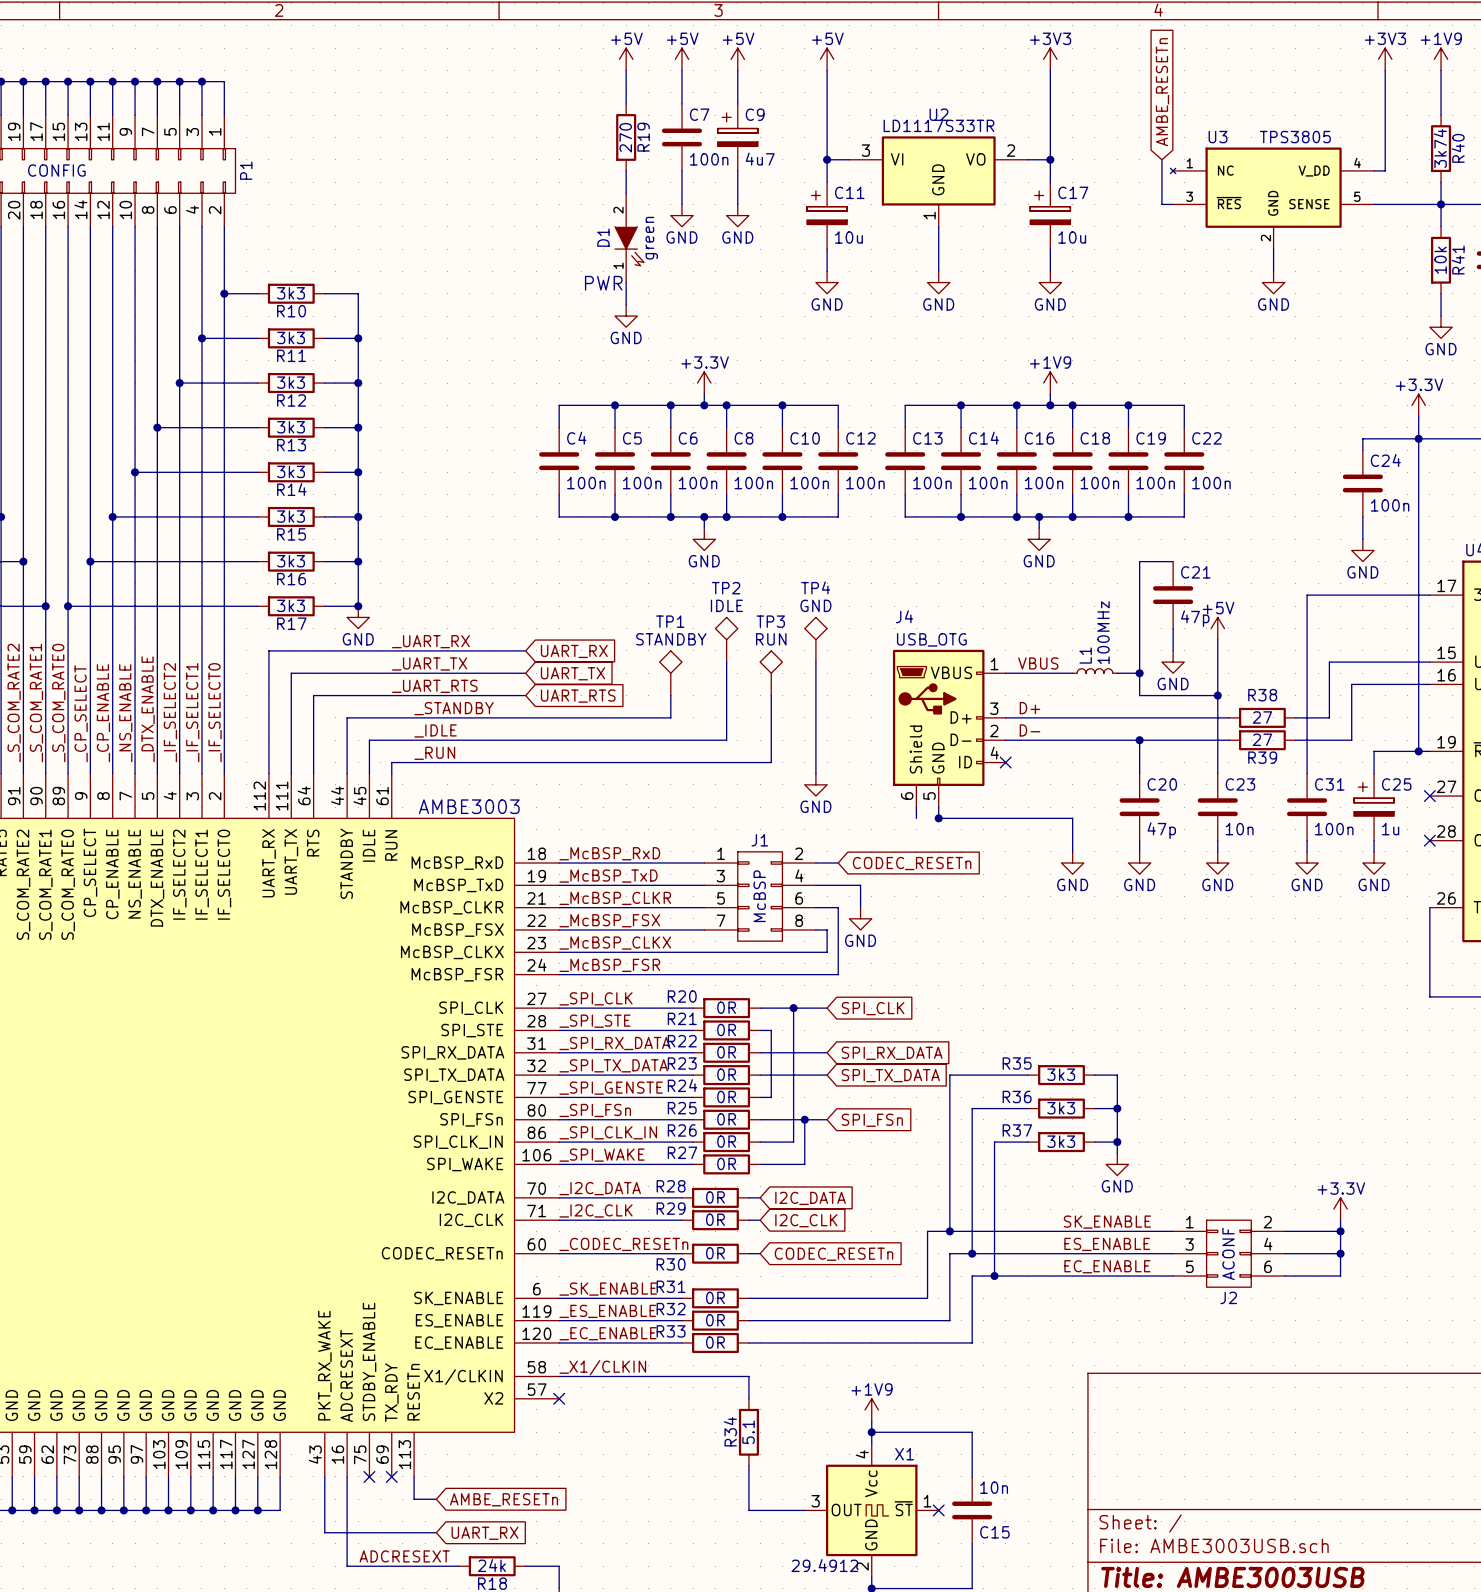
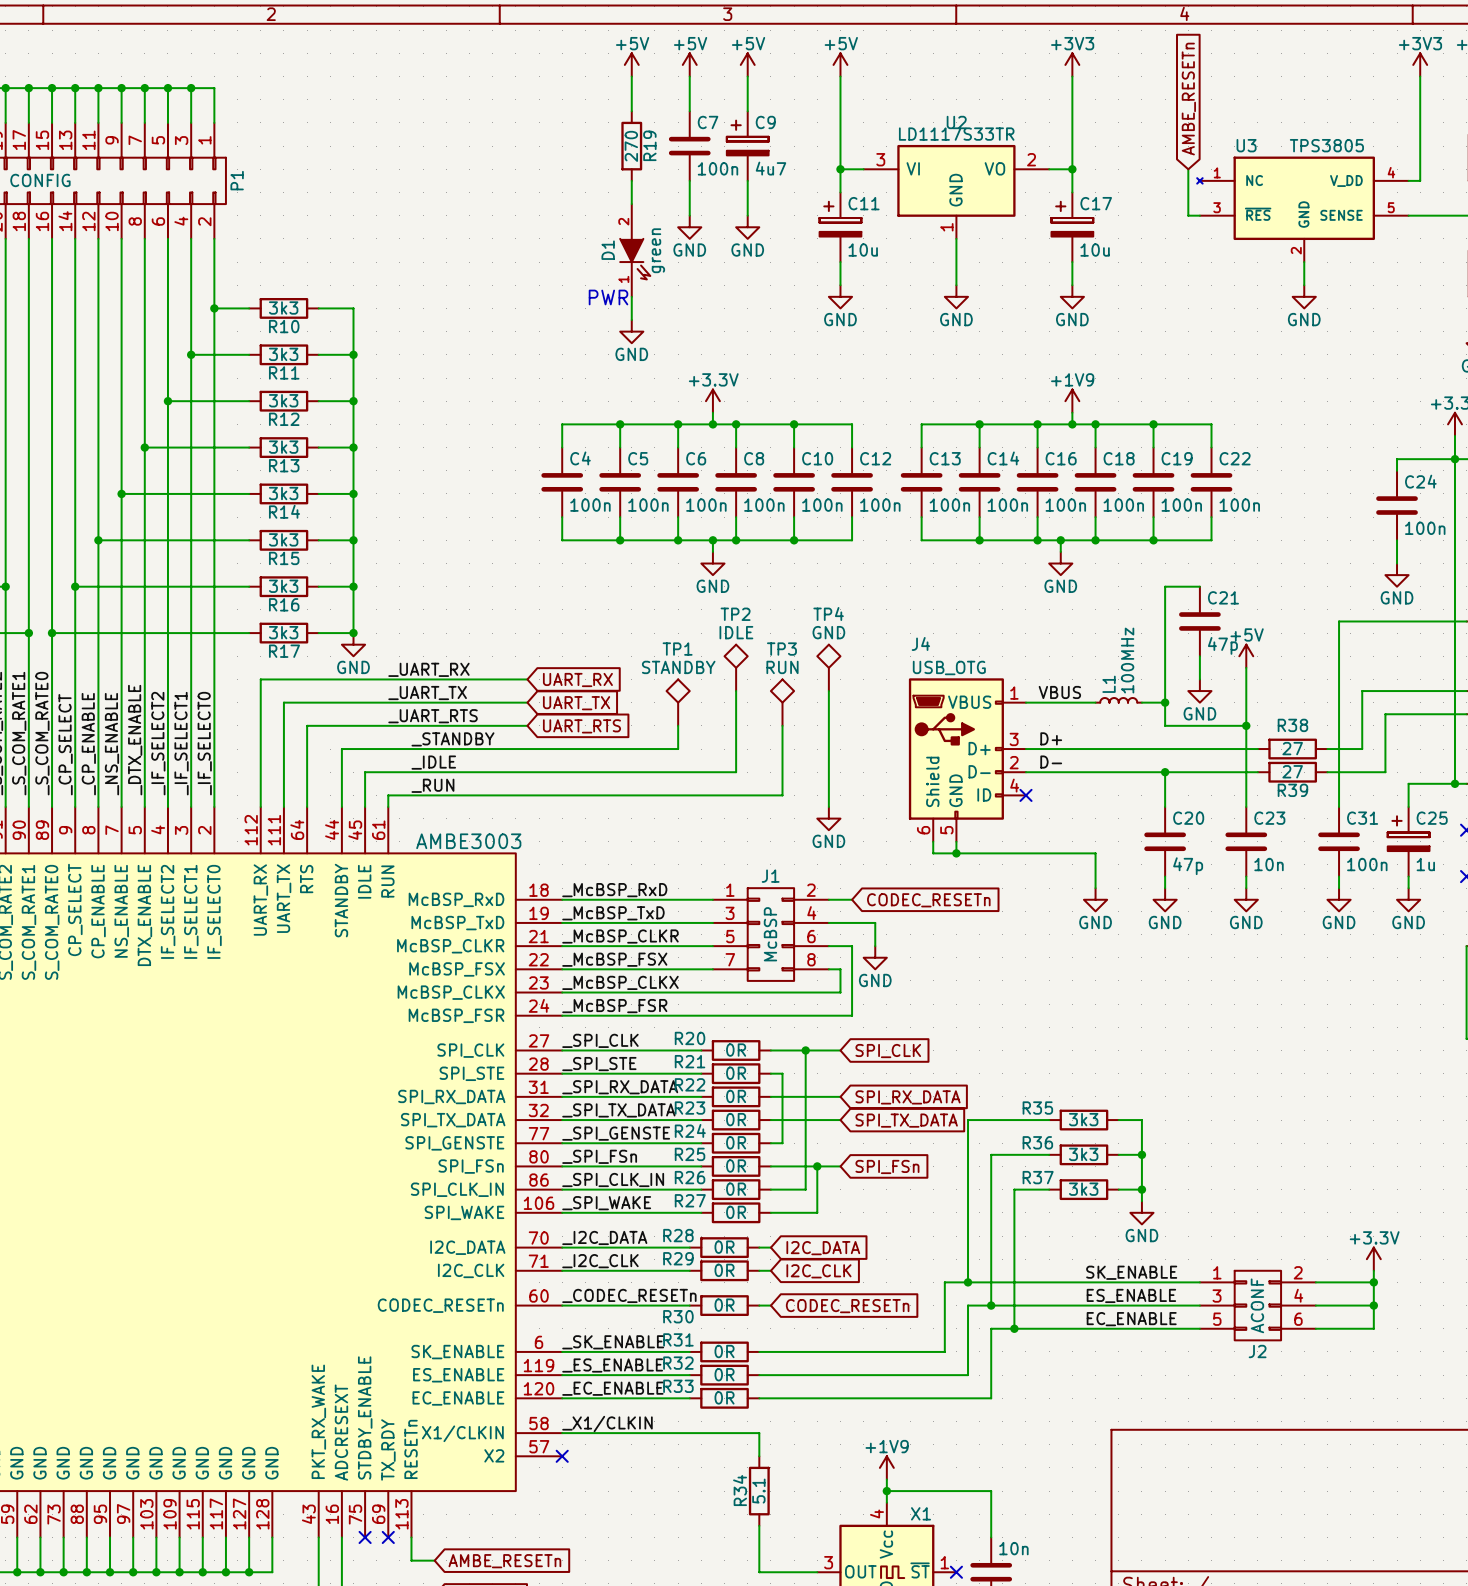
wire: none -> (933, 853) (956, 853)

